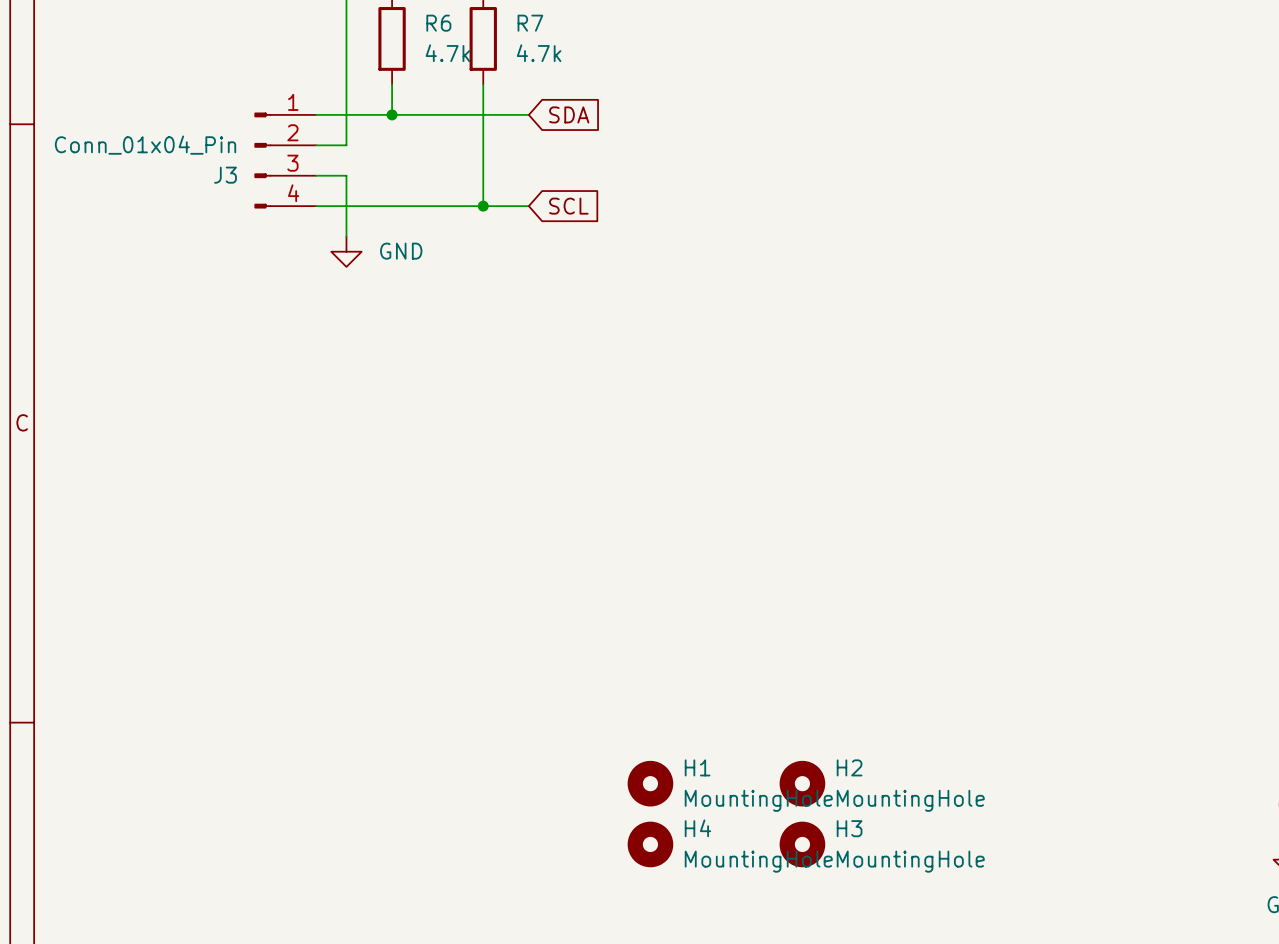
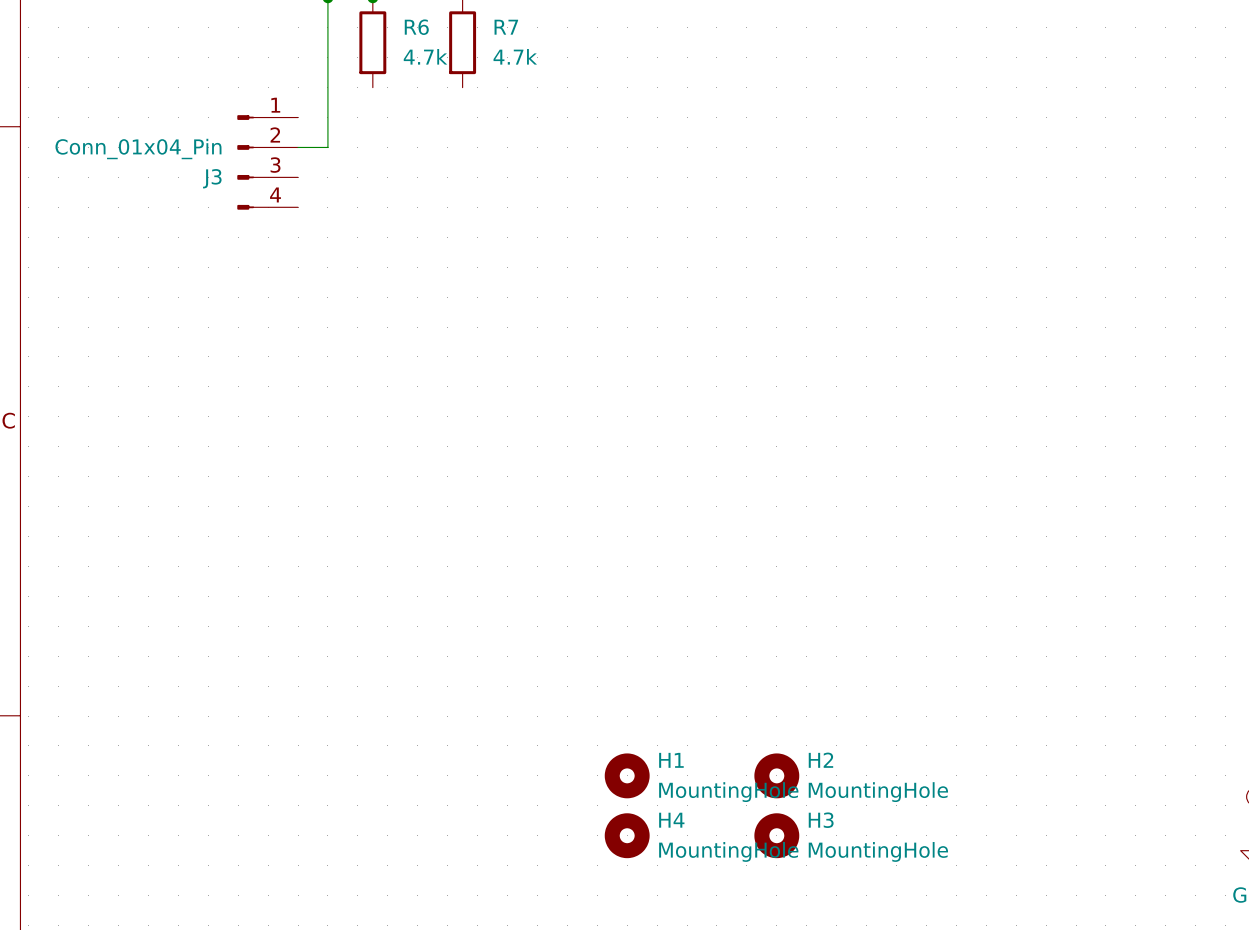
wire: (392, 84) (392, 114) -> none
wire: (483, 84) (483, 206) -> none
wire: (316, 114) (528, 114) -> none
junction: (392, 114) -> none
global label: SDA (569, 114) -> none
wire: (316, 175) (346, 175) (346, 236) -> none
wire: (316, 206) (528, 206) -> none
junction: (483, 206) -> none
global label: SCL (568, 206) -> none
power symbol: GND (346, 251) -> none

